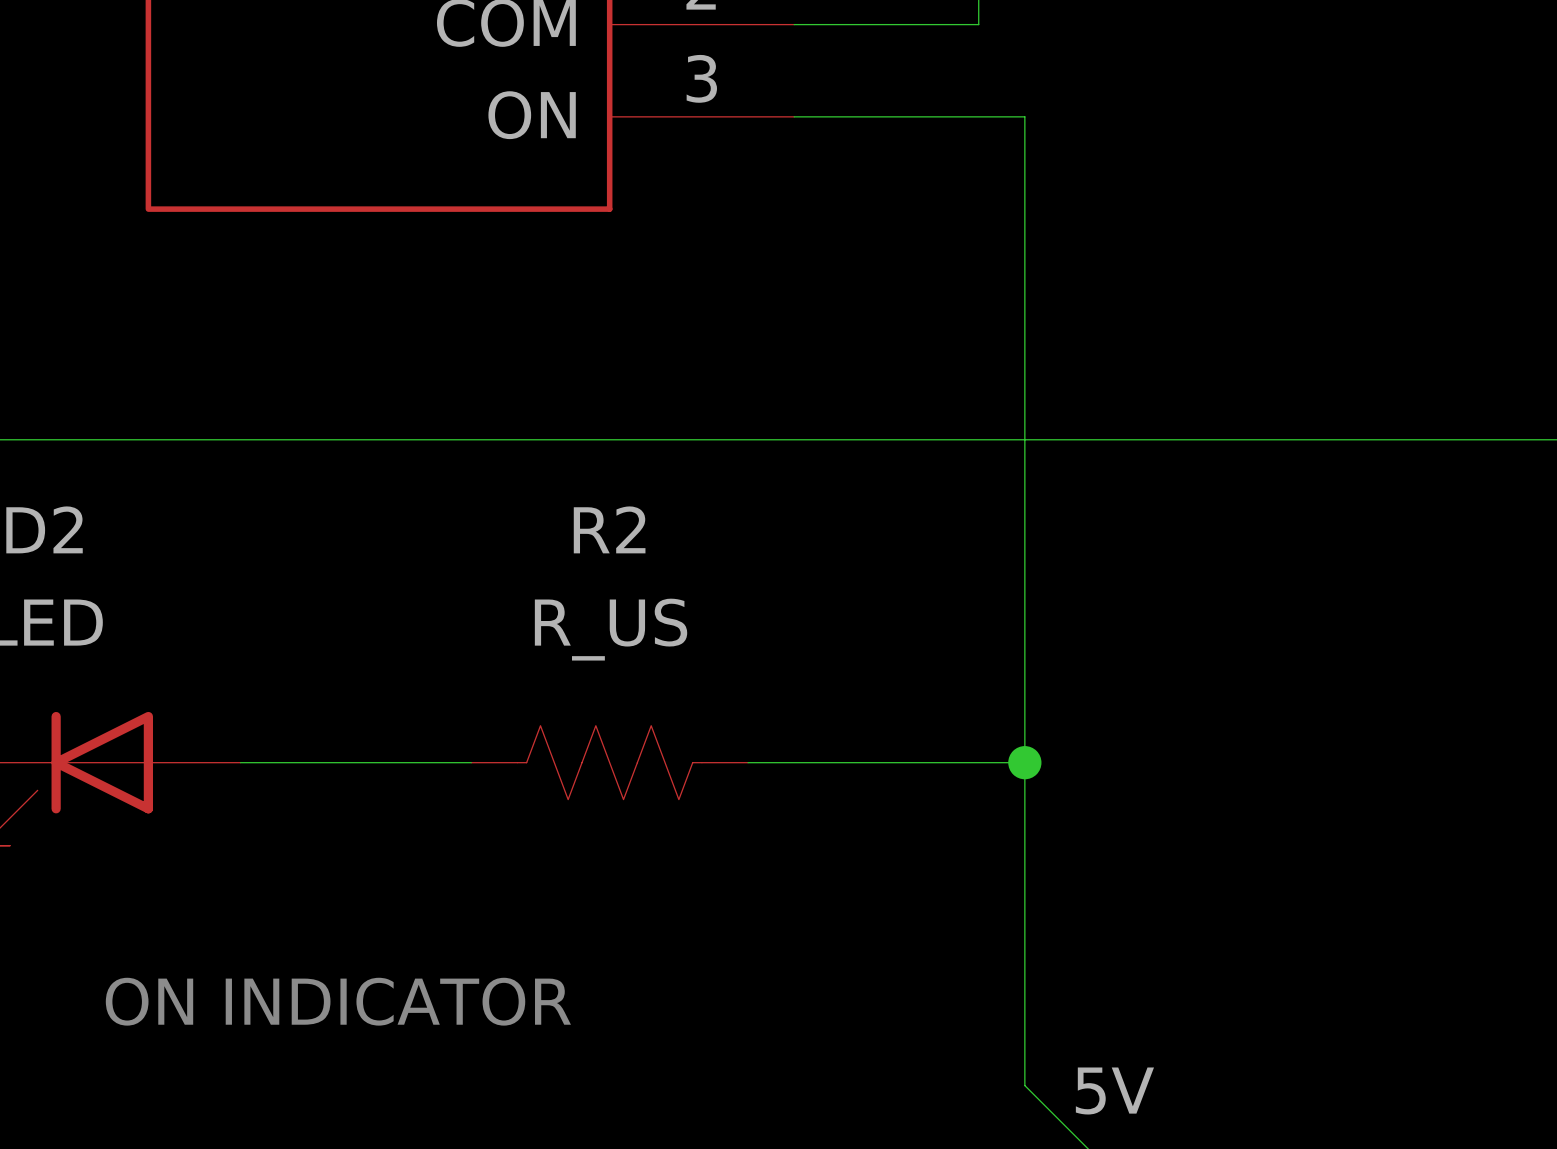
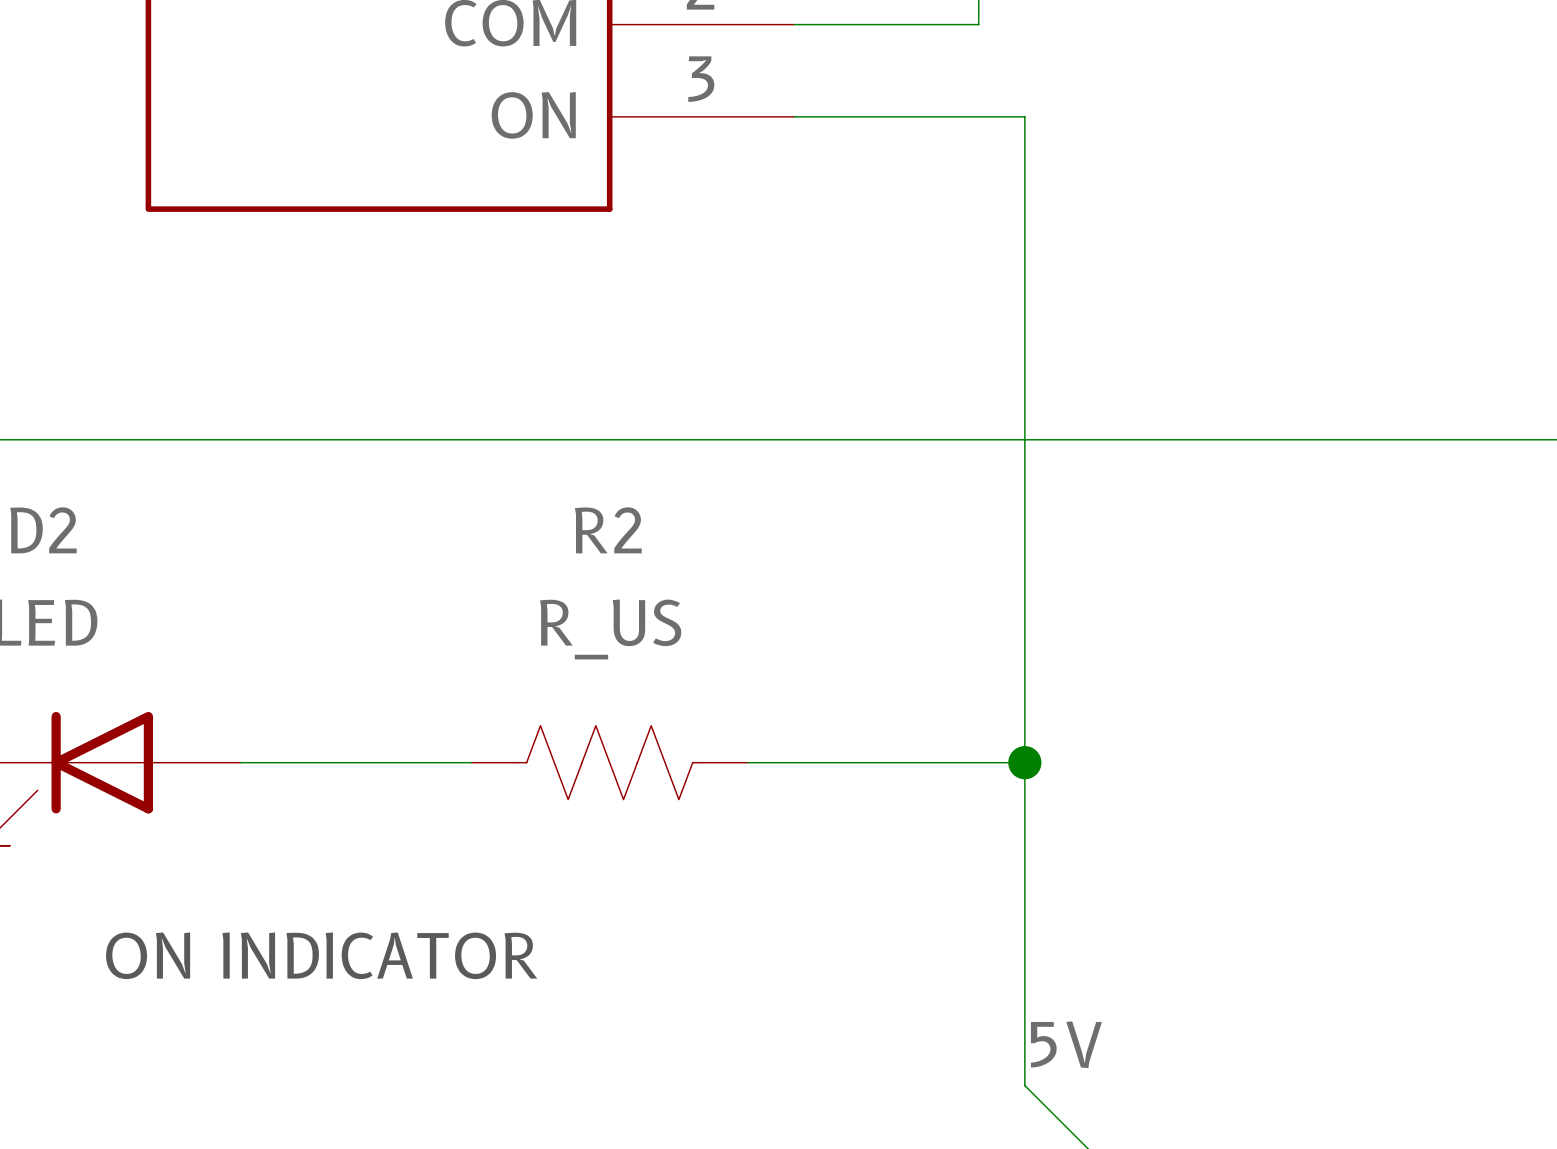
text position: ON INDICATOR (338, 1001) -> ON INDICATOR (321, 955)
label position: 5V (1114, 1091) -> 5V (1066, 1044)

